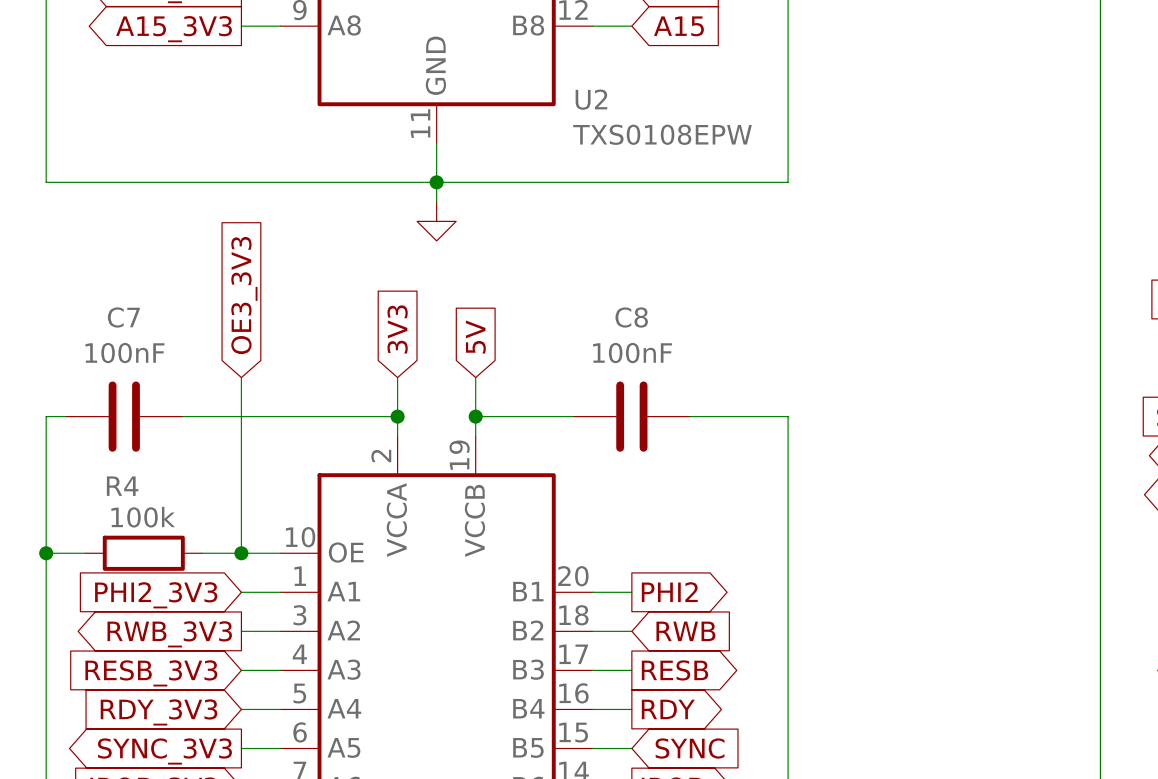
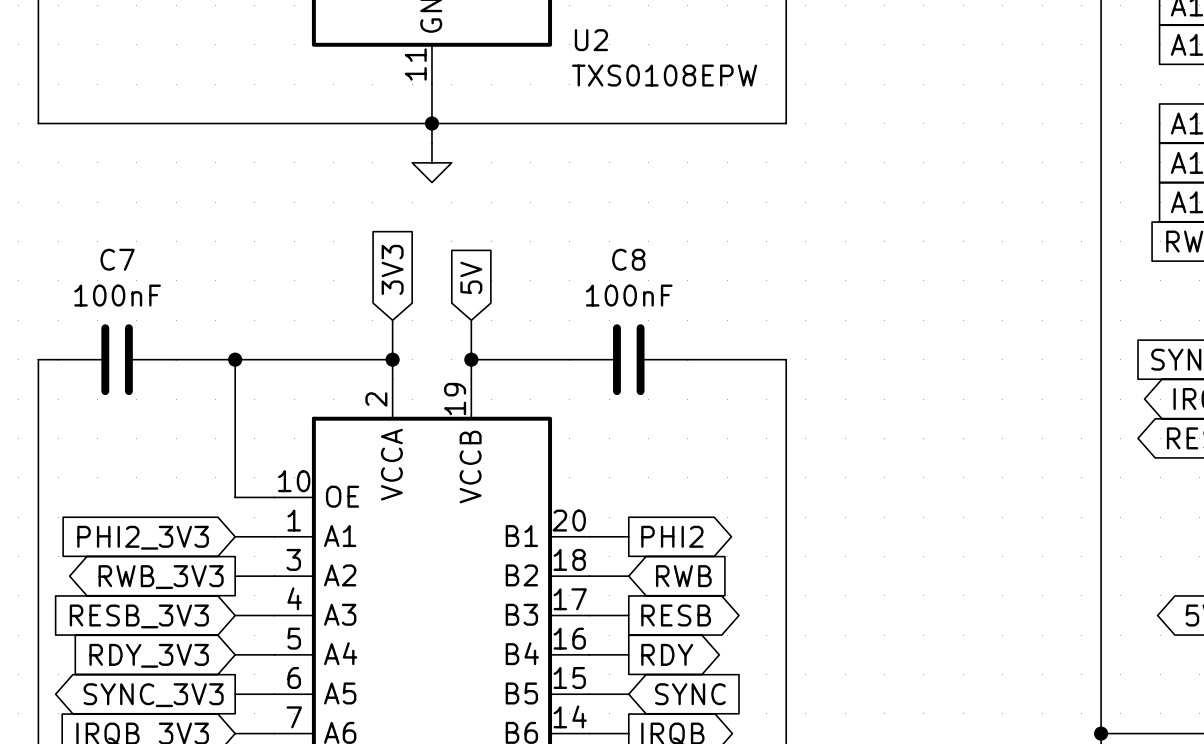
global label: OE3_3V3 (244, 295) -> none
wire: (241, 377) (241, 416) -> none
junction: none -> (235, 359)
wire: (46, 553) (85, 553) -> none
junction: (46, 553) -> none
R4: 100k (143, 553) -> none
wire: (202, 553) (241, 553) -> none
junction: (241, 553) -> none

